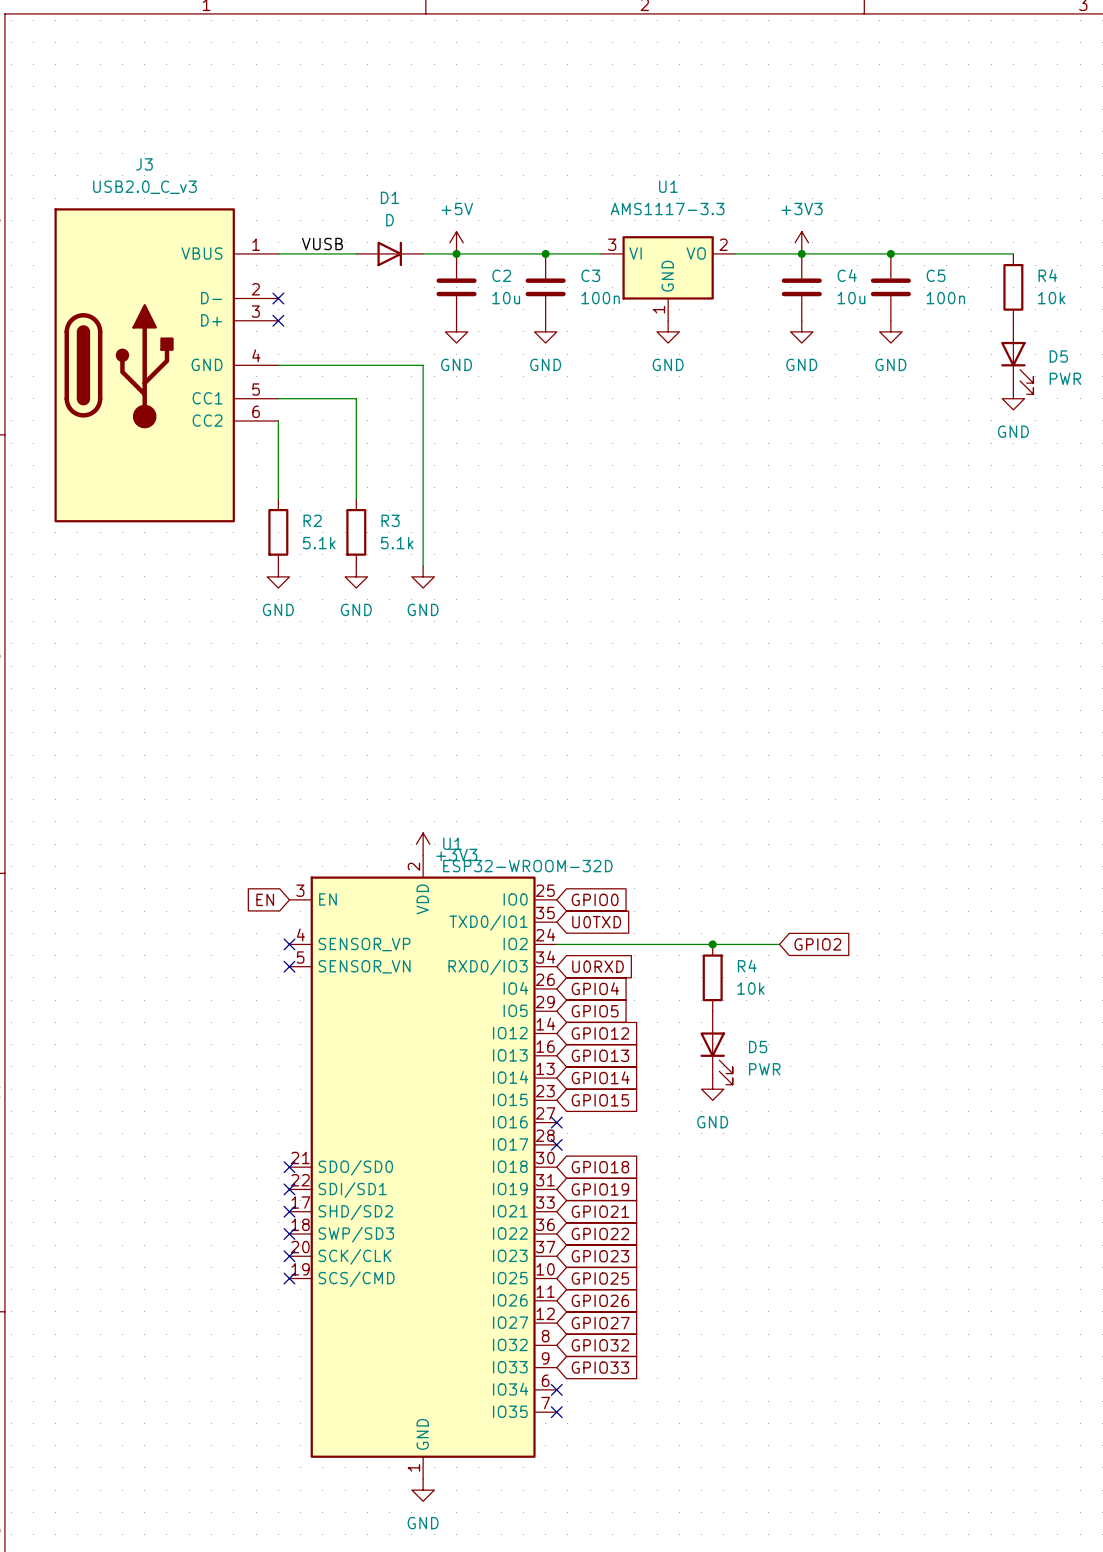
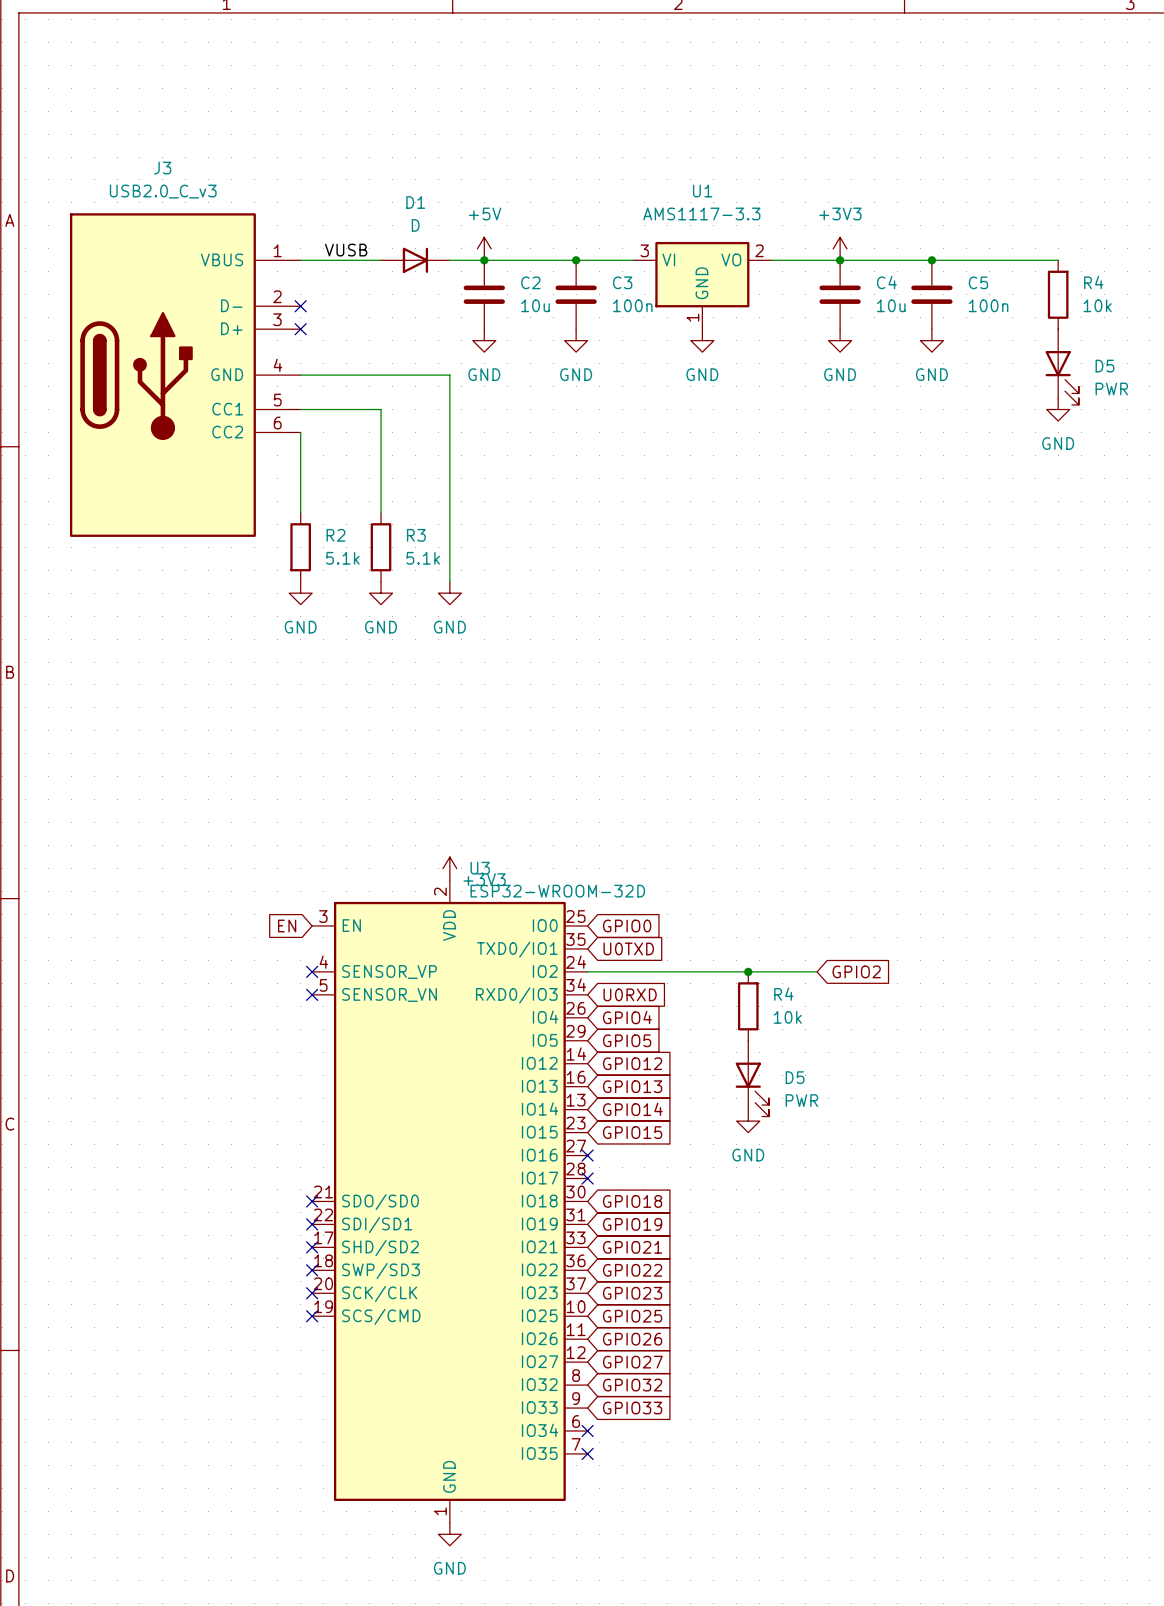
U1 name: U1 (452, 843) -> U3 (480, 868)

